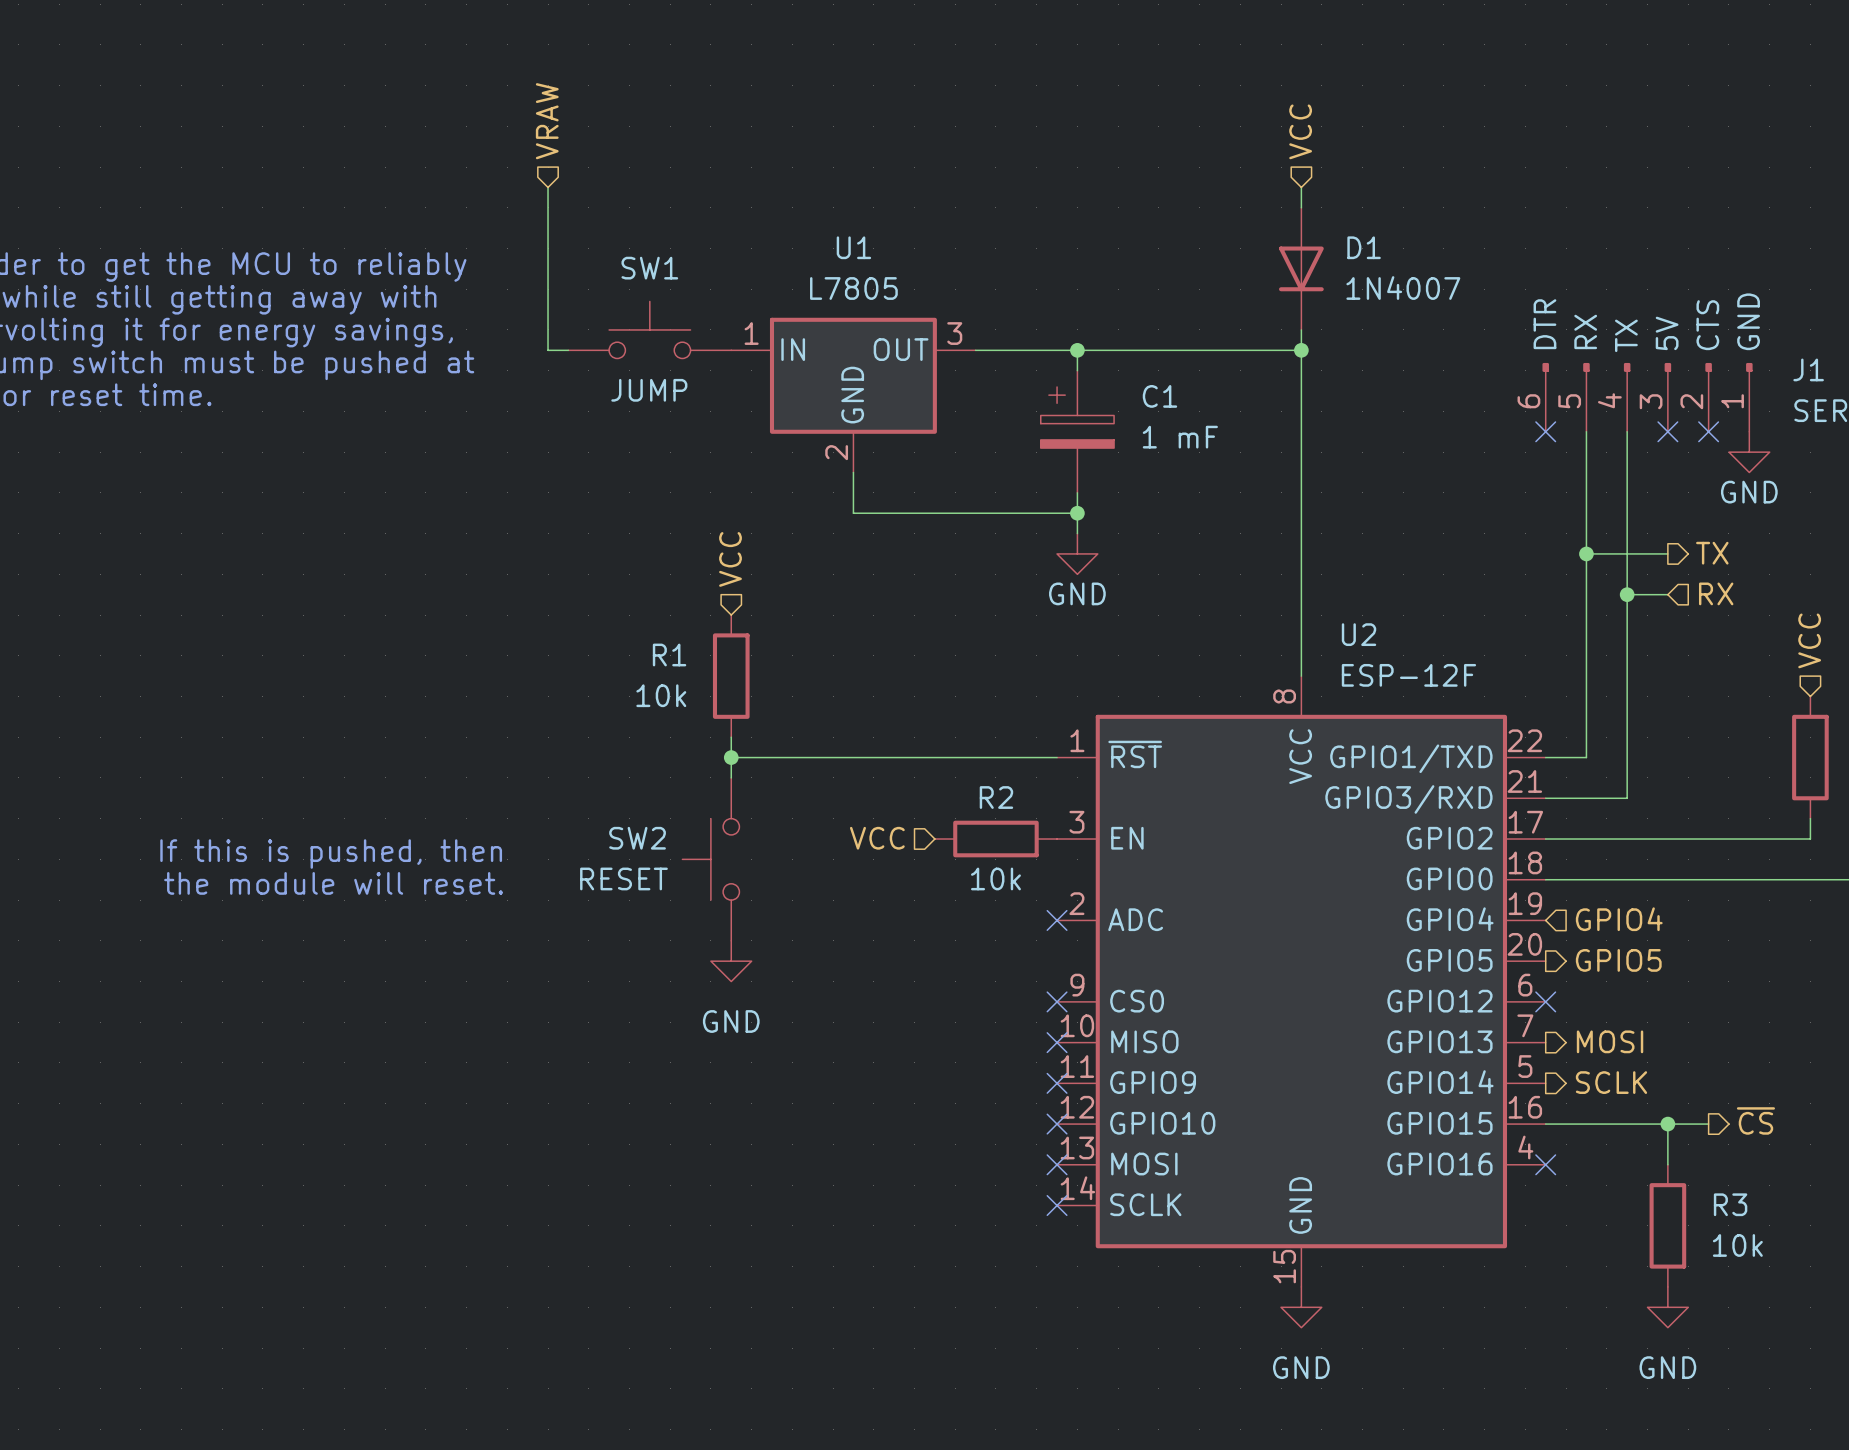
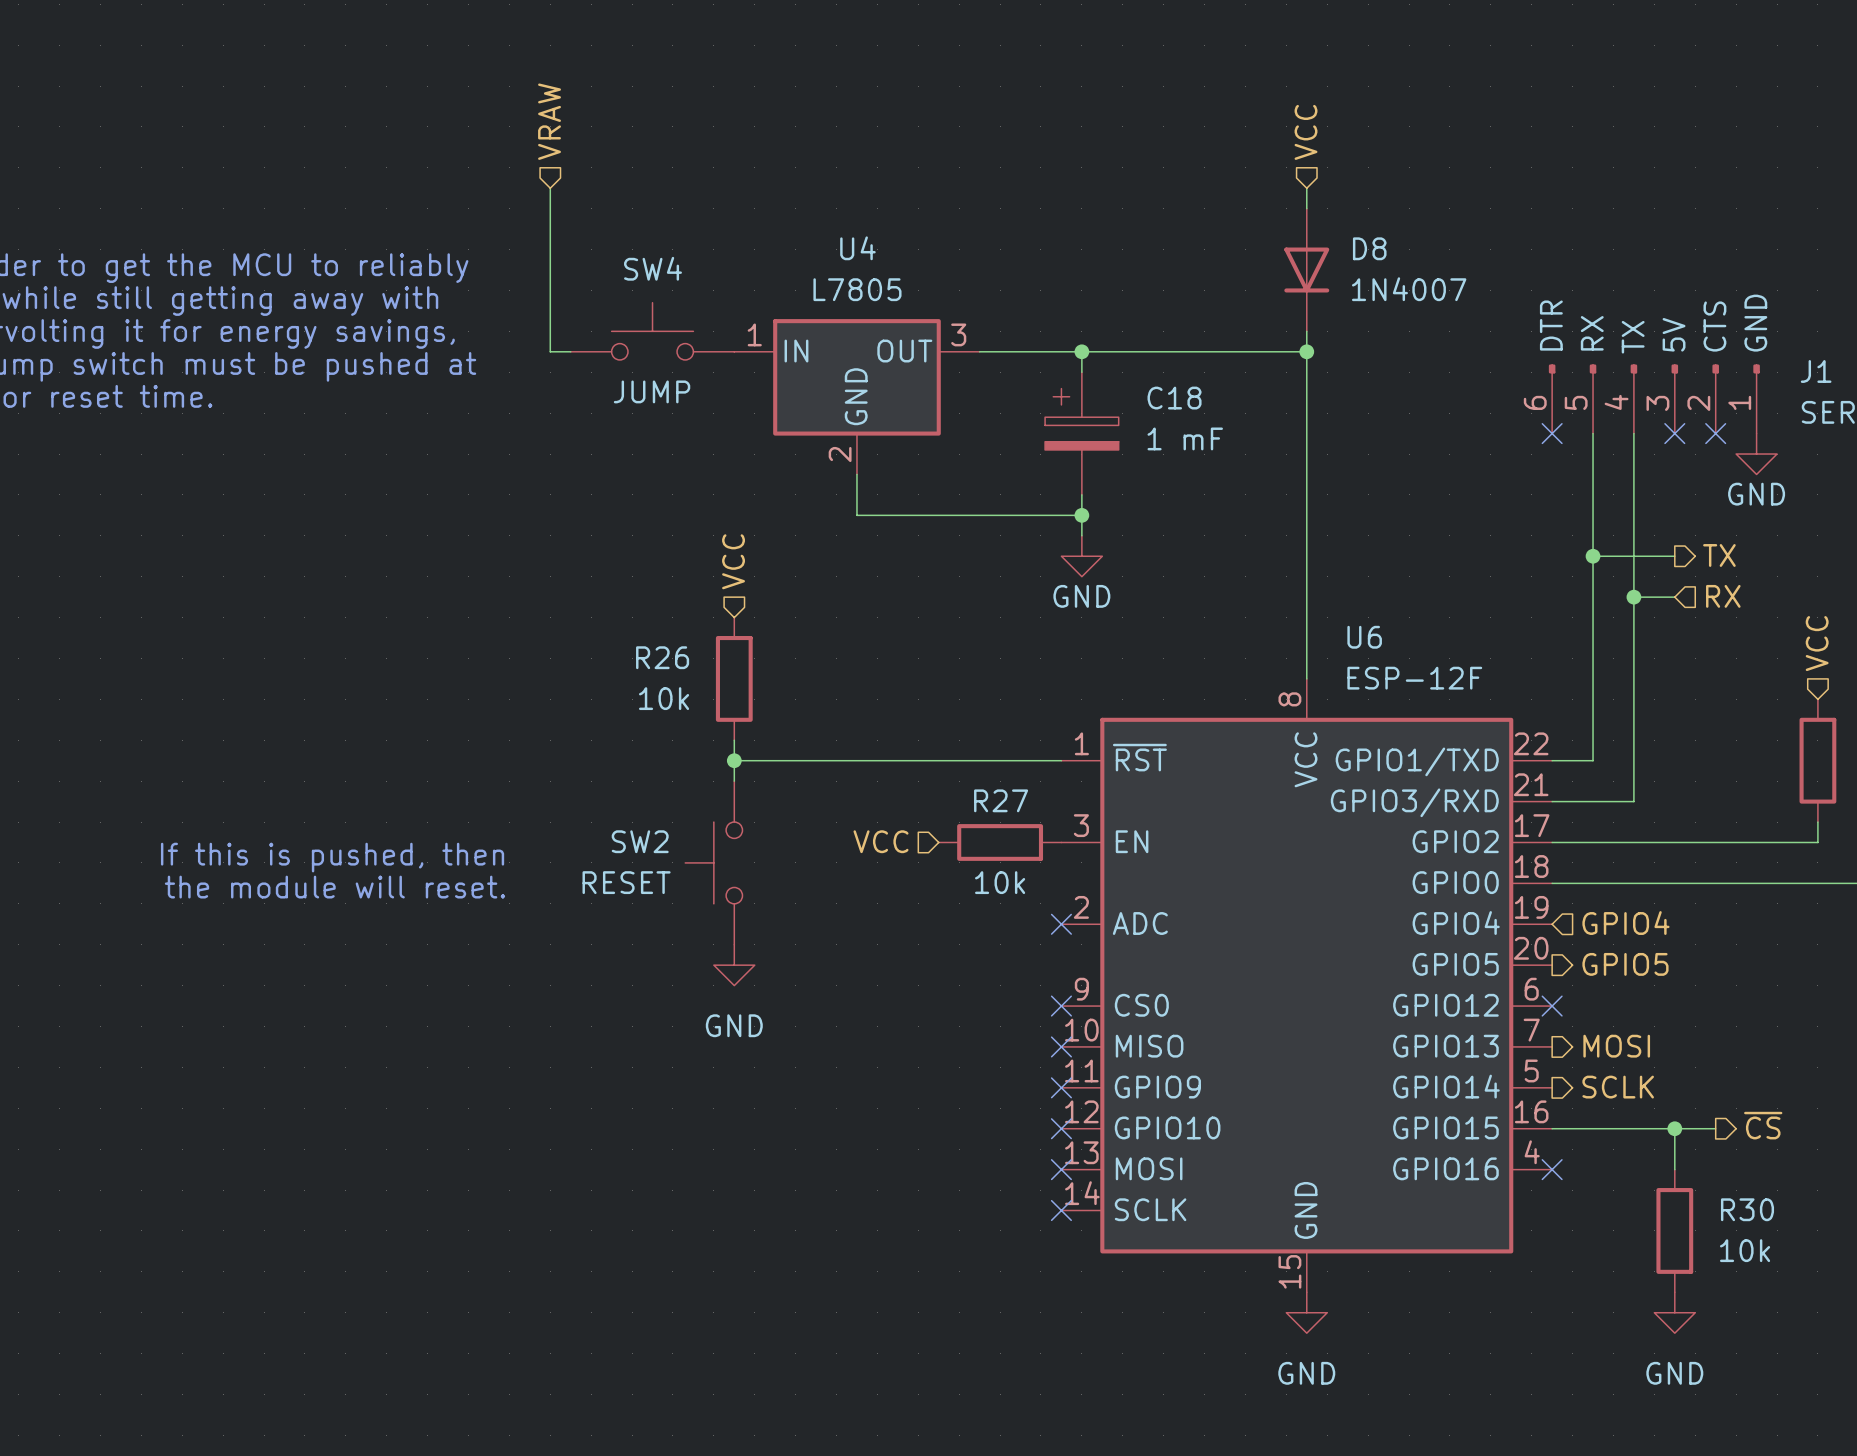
U1 name: U1 (853, 247) -> U4 (857, 248)
D1 name: D1 (1364, 247) -> D8 (1369, 248)
SW1 name: SW1 (649, 268) -> SW4 (653, 268)
C1 name: C1 (1159, 396) -> C18 (1174, 398)
U2 name: U2 (1359, 634) -> U6 (1364, 637)
R1 name: R1 (669, 654) -> R26 (662, 657)
R2 name: R2 (996, 797) -> R27 (1001, 800)
R3 name: R3 (1730, 1204) -> R30 (1747, 1209)

